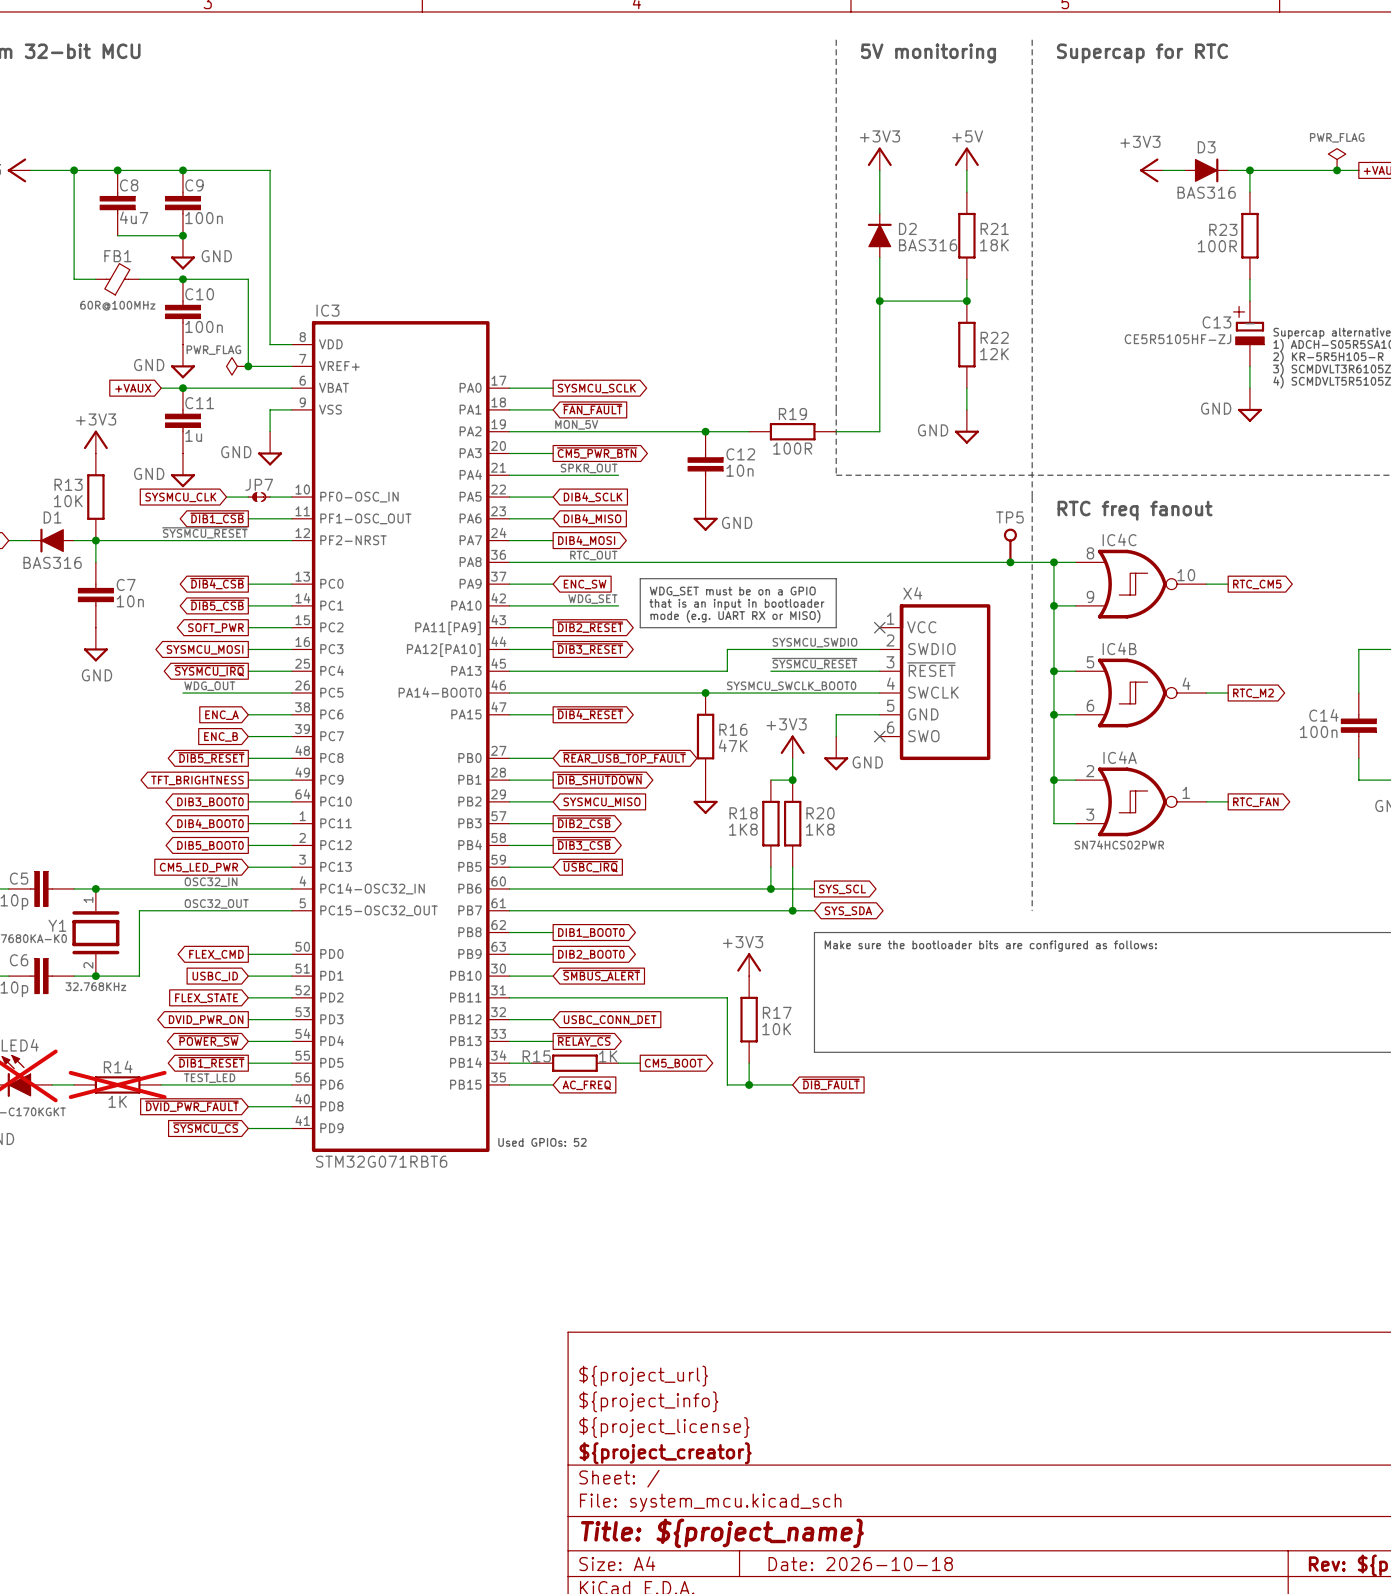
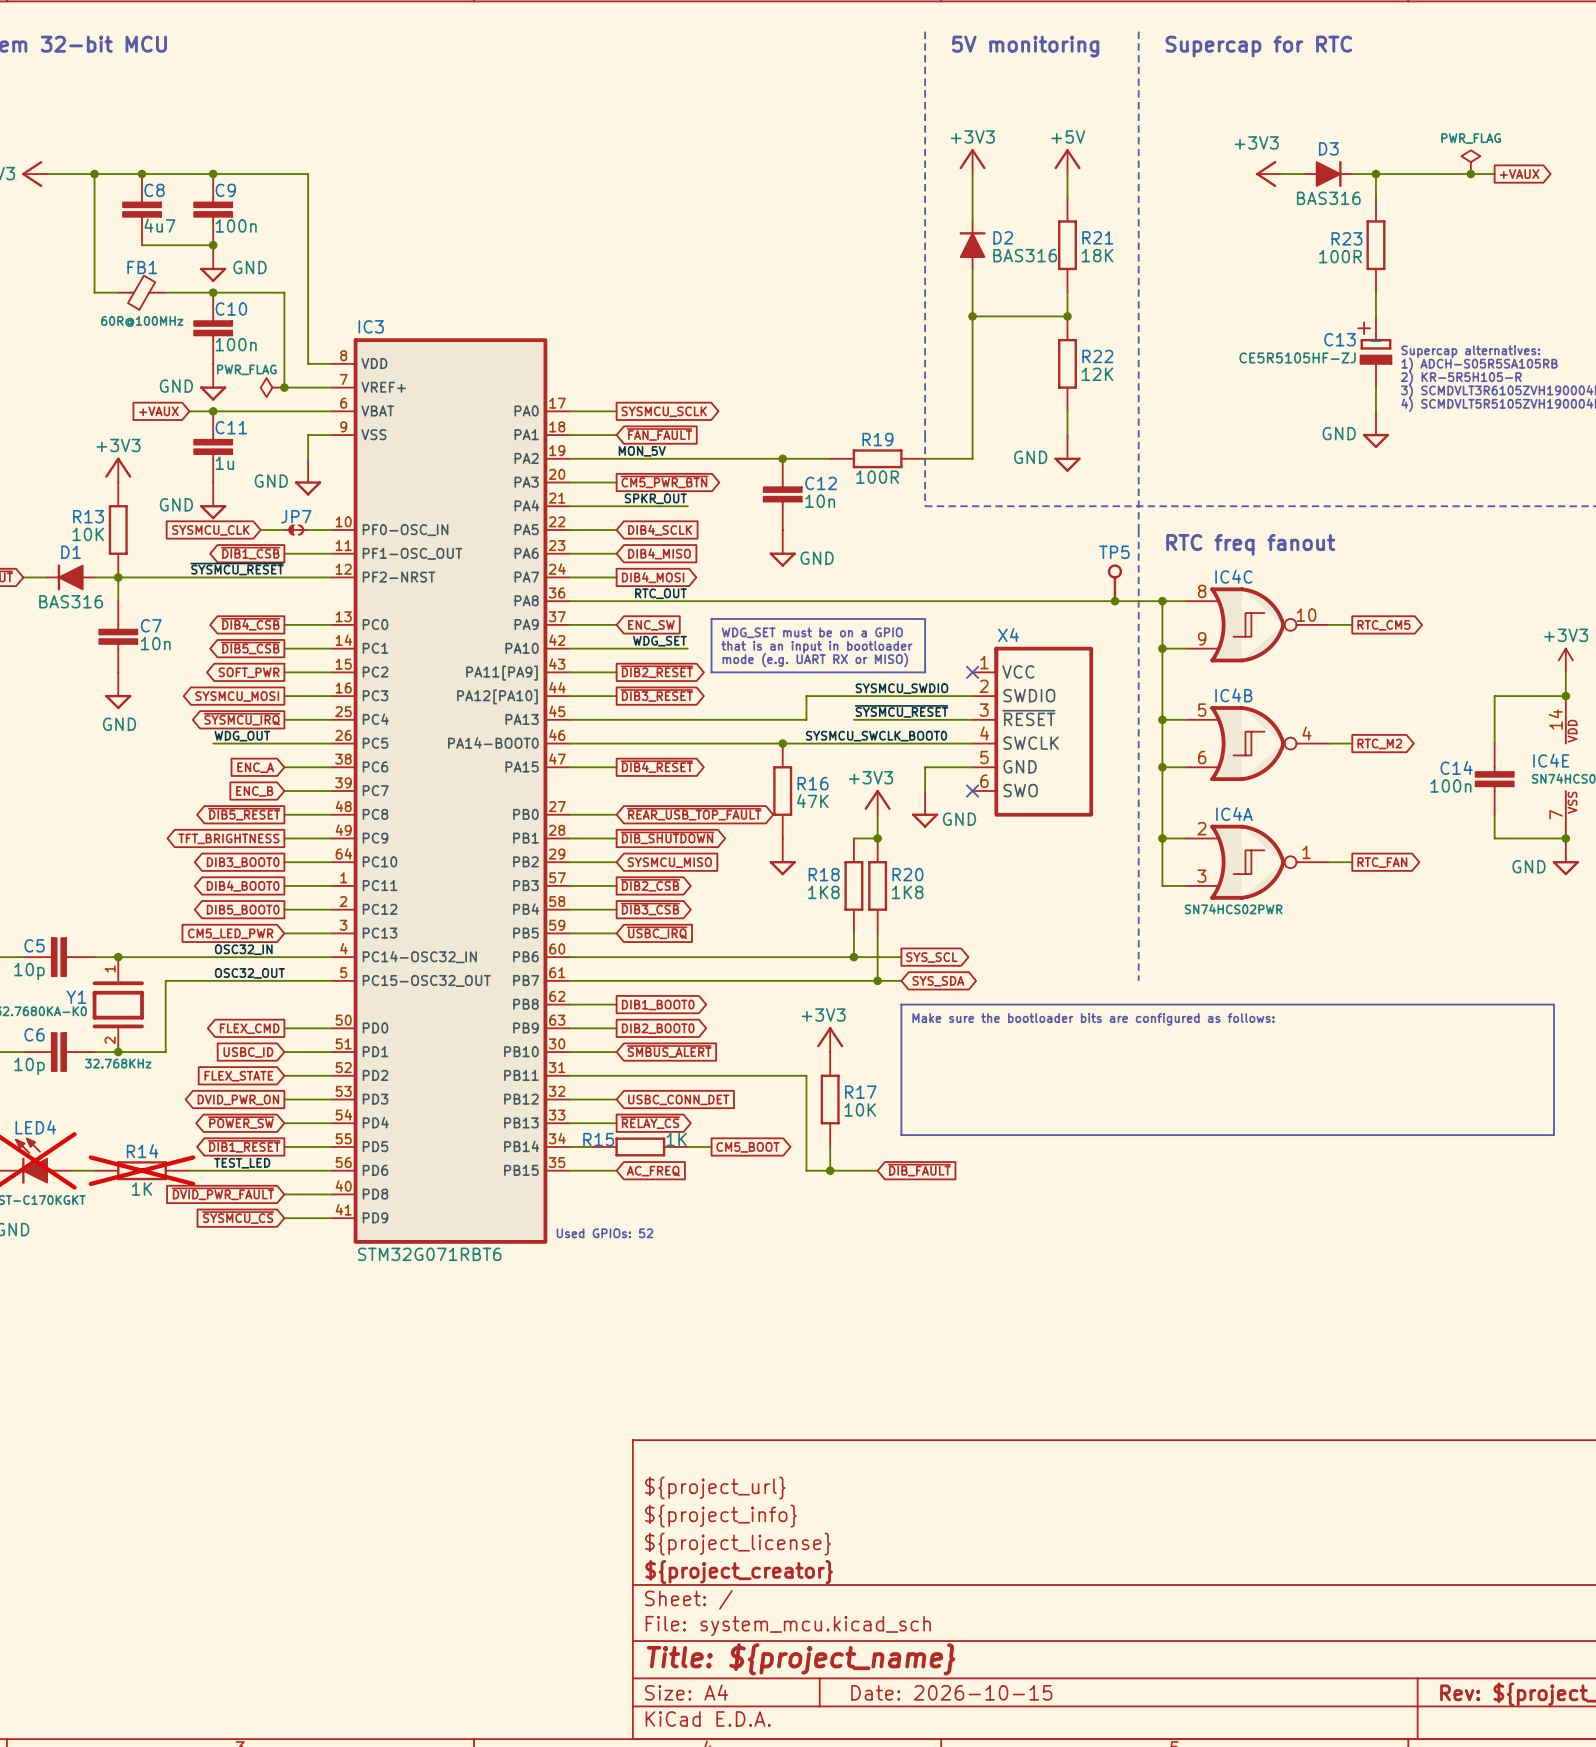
title block: Date: 2026-10-18 (860, 1564) -> Date: 2026-10-15 (951, 1692)

